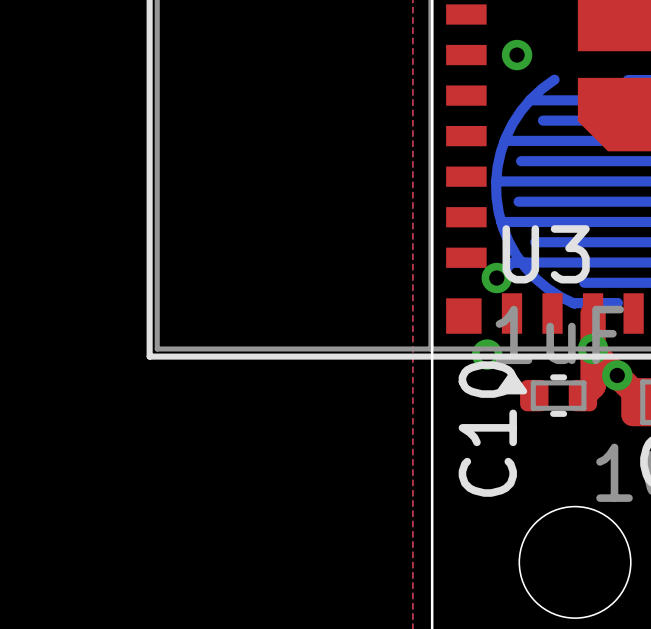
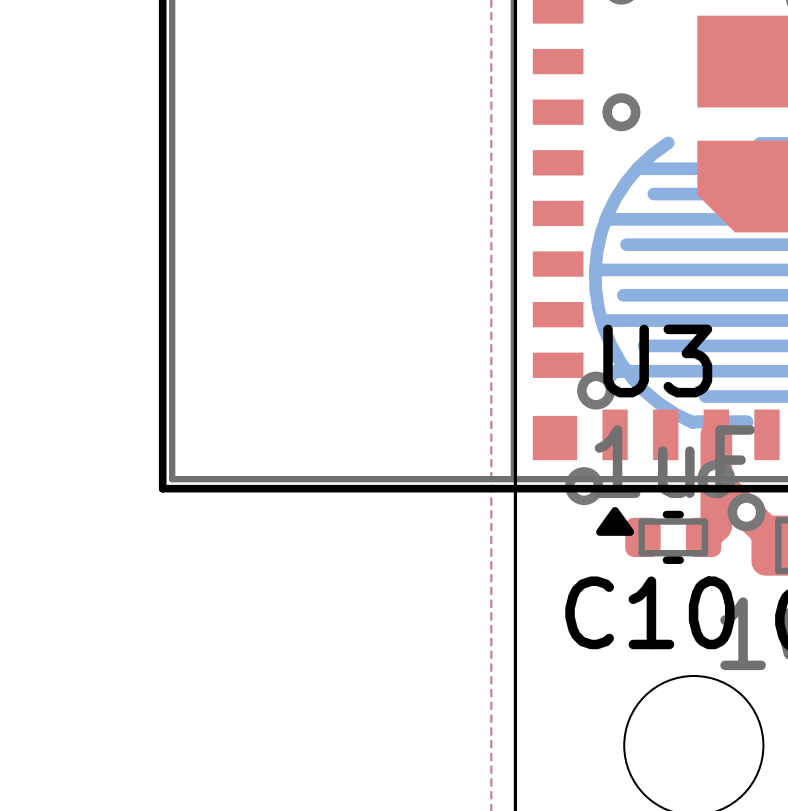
C10 name rotation: 0° (487, 429) -> 90° clockwise (649, 612)

